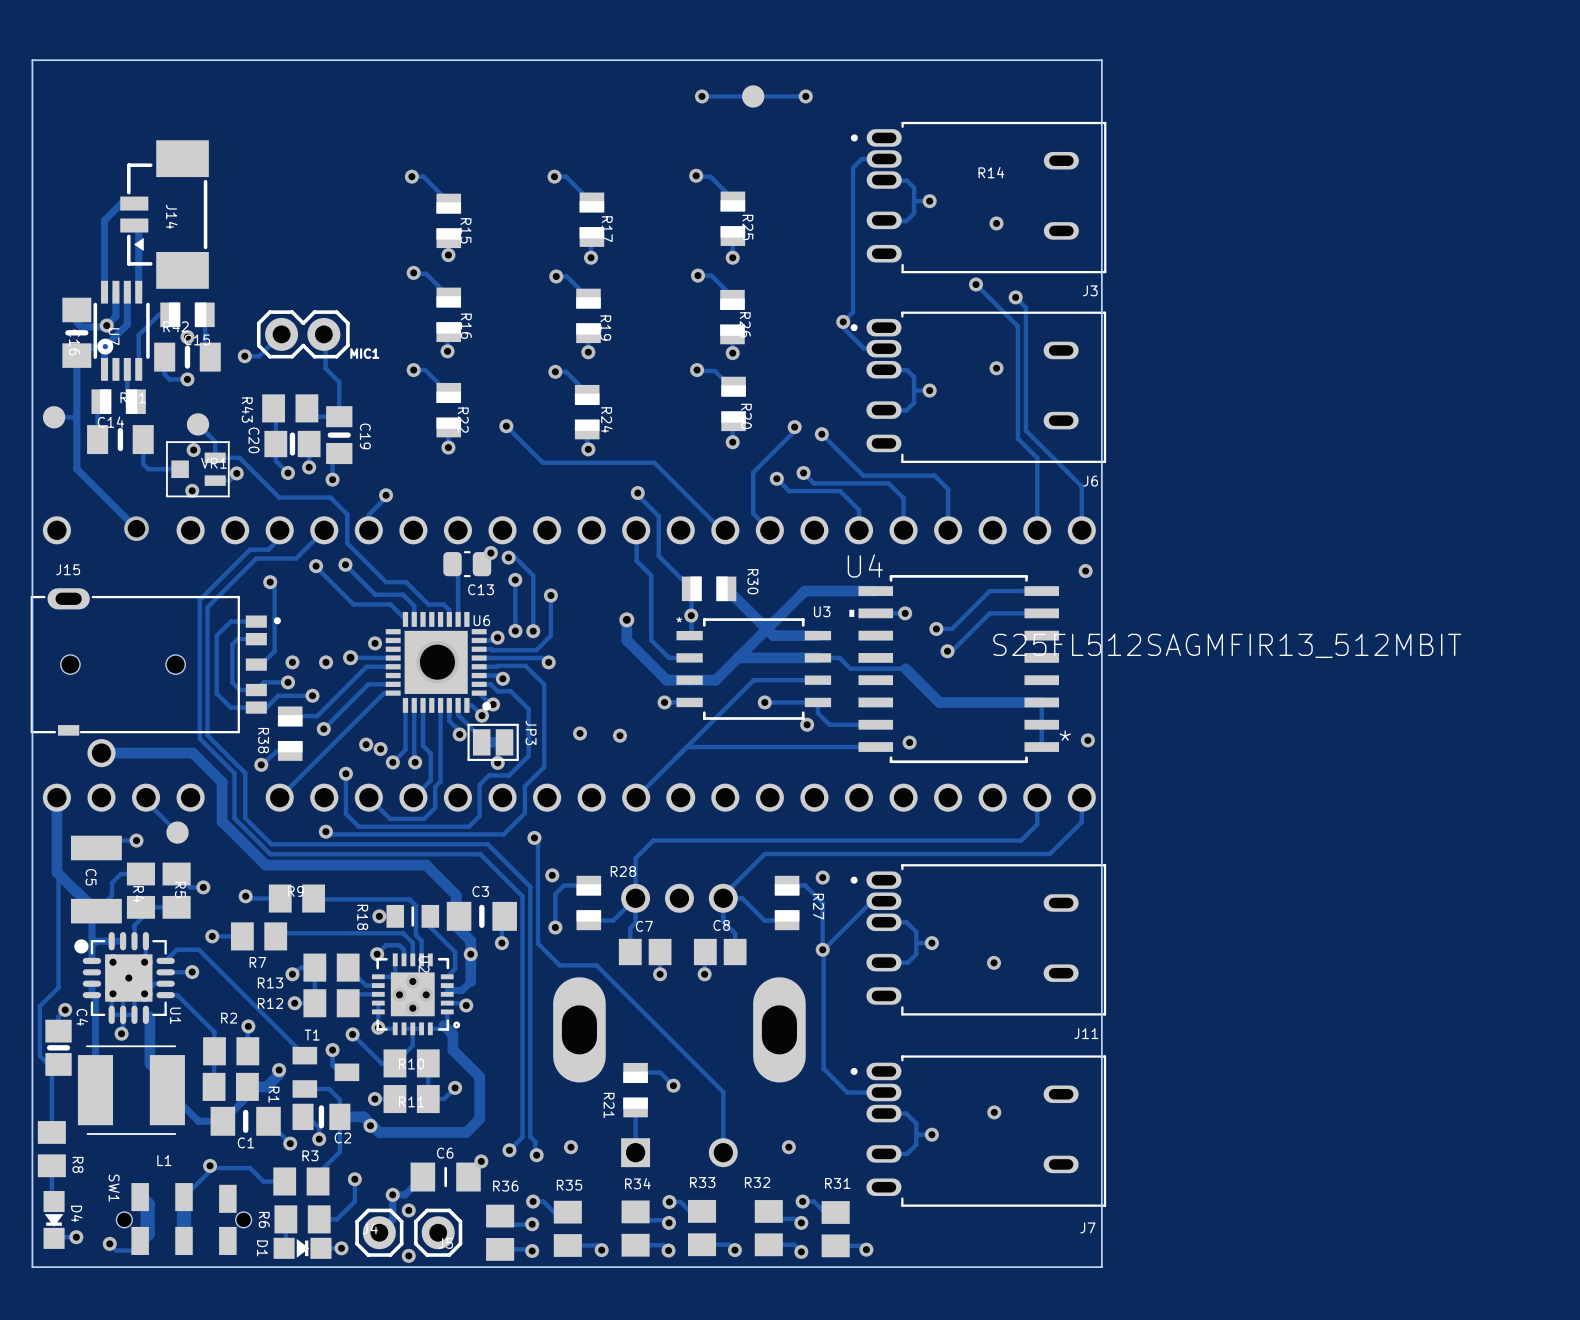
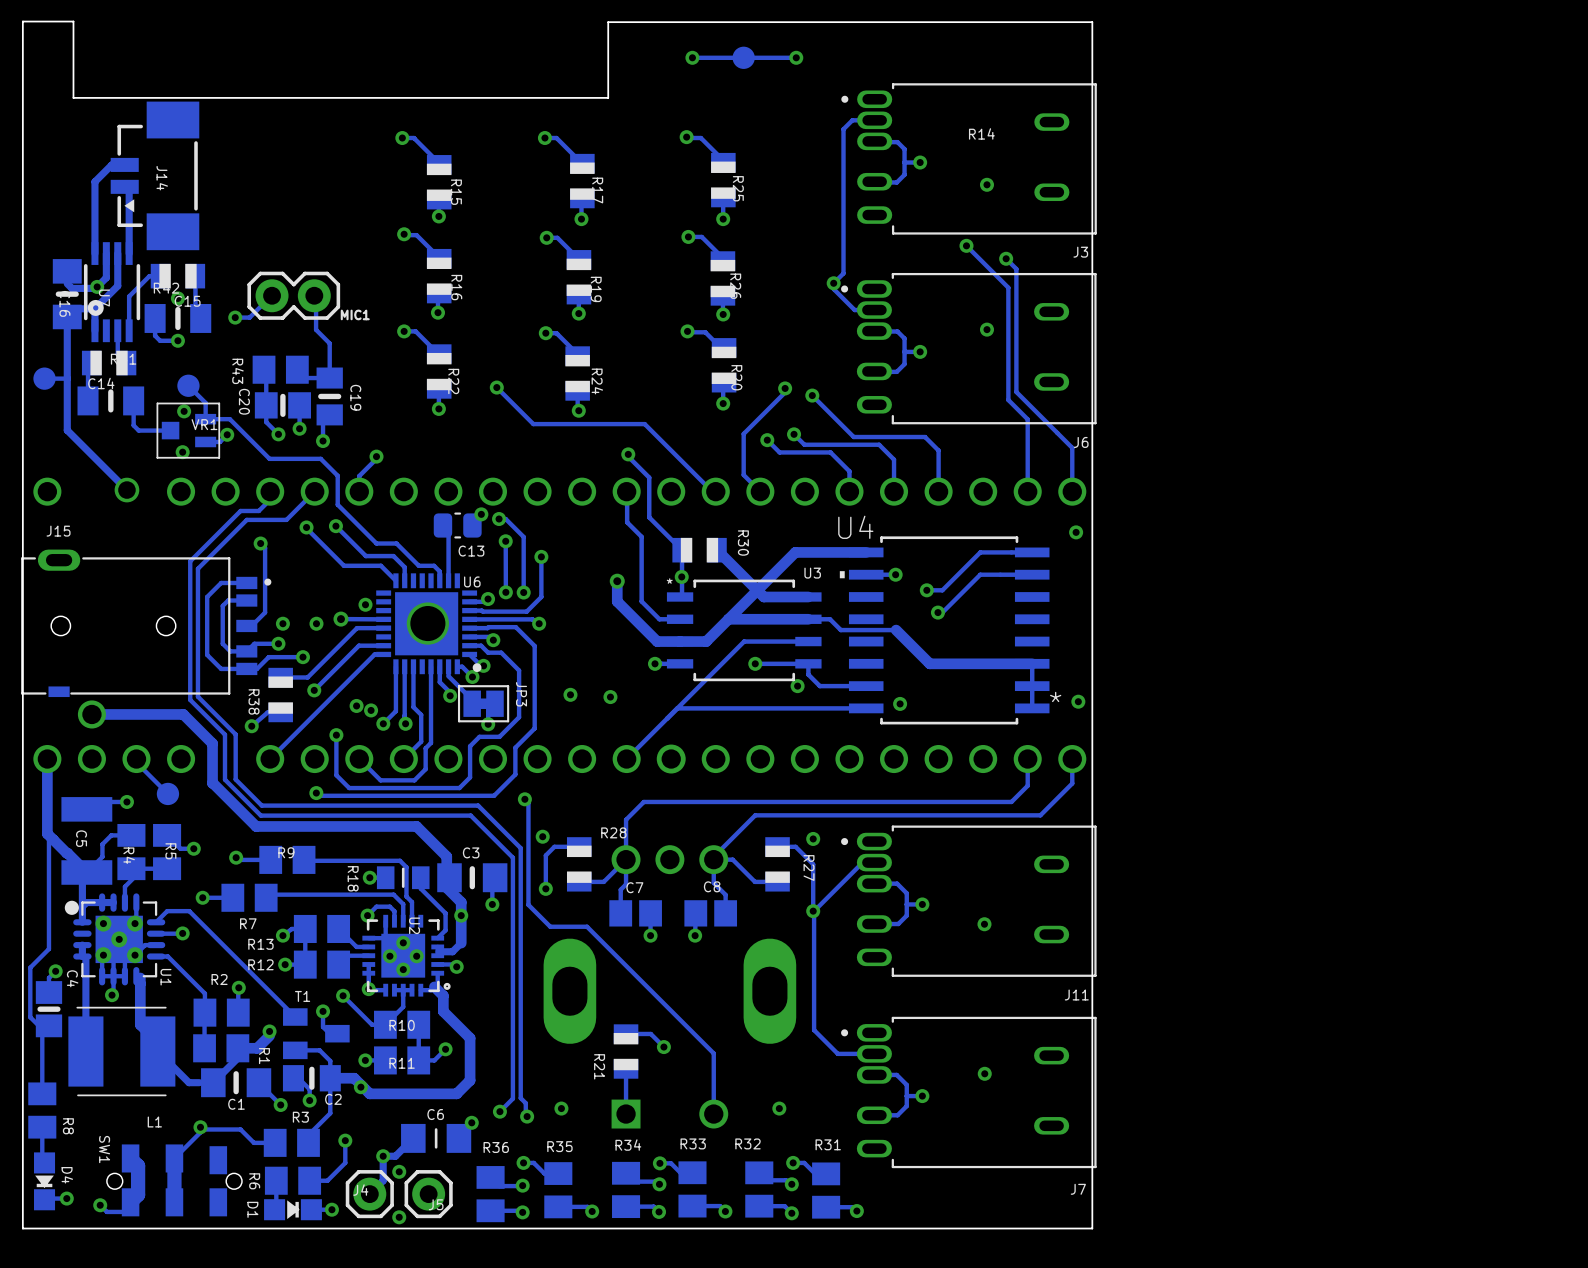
board edge: (83, 60) (1101, 60) -> (73, 21) (73, 97) (608, 97) (608, 22) (1092, 22)
U4 value: S25FL512SAGMFIR13_512MBIT (1227, 645) -> none

